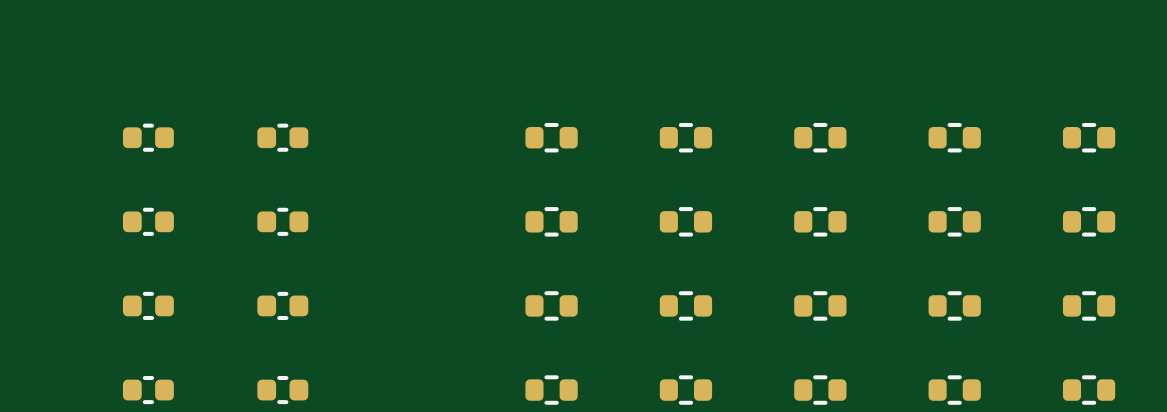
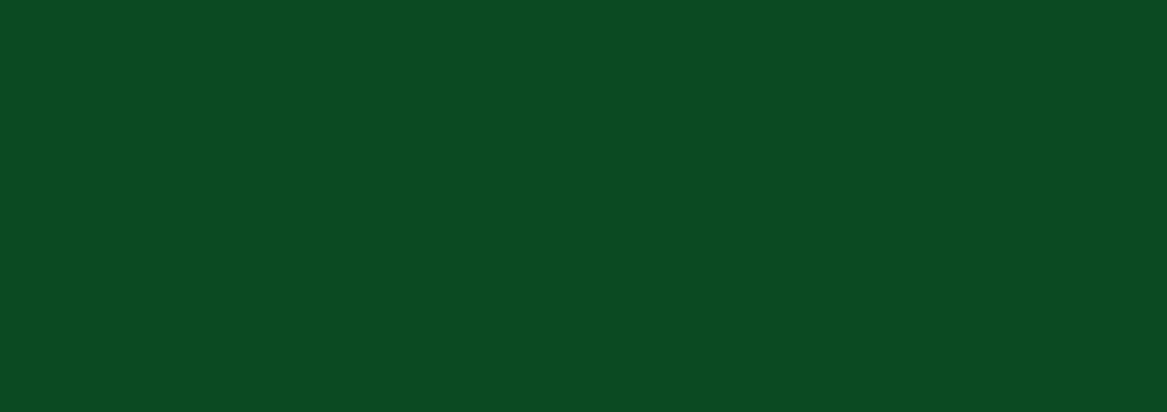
part: (148, 137) -> none
part: (282, 137) -> none
part: (551, 137) -> none
part: (685, 137) -> none
part: (820, 137) -> none
part: (954, 137) -> none
part: (1089, 137) -> none
part: (148, 221) -> none
part: (282, 221) -> none
part: (551, 221) -> none
part: (685, 221) -> none
part: (820, 221) -> none
part: (954, 221) -> none
part: (1089, 221) -> none
part: (148, 305) -> none
part: (282, 305) -> none
part: (551, 305) -> none
part: (685, 305) -> none
part: (820, 305) -> none
part: (954, 305) -> none
part: (1089, 305) -> none
part: (148, 390) -> none
part: (282, 390) -> none
part: (551, 390) -> none
part: (685, 390) -> none
part: (820, 390) -> none
part: (954, 390) -> none
part: (1089, 390) -> none

